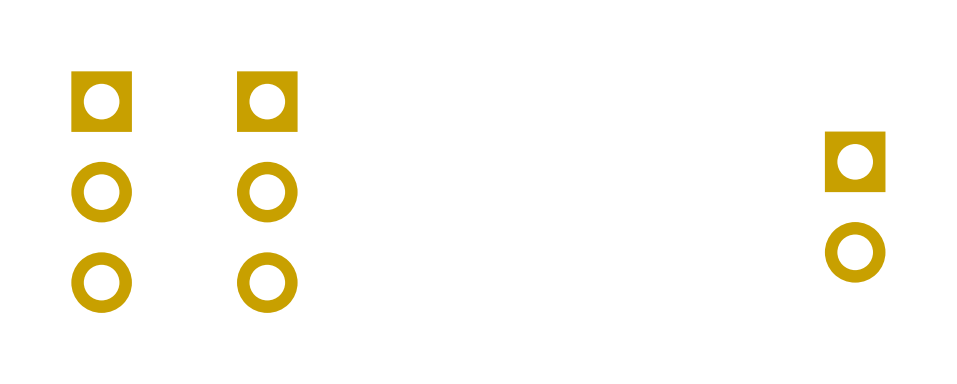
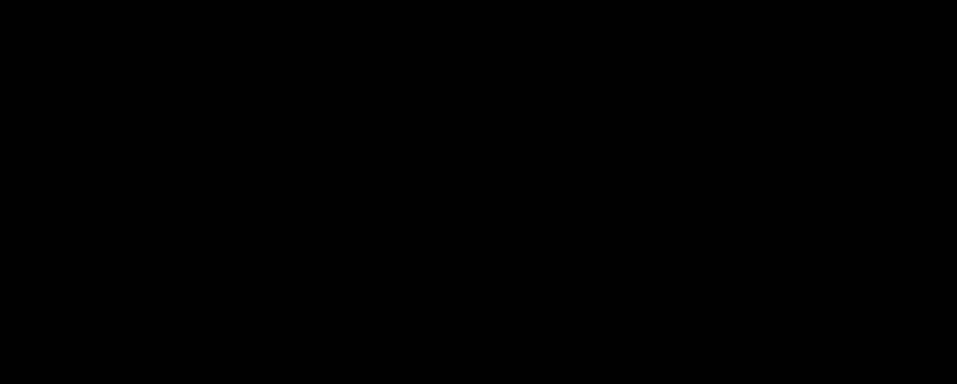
part: (101, 192) -> none
part: (267, 192) -> none
part: (855, 207) -> none

